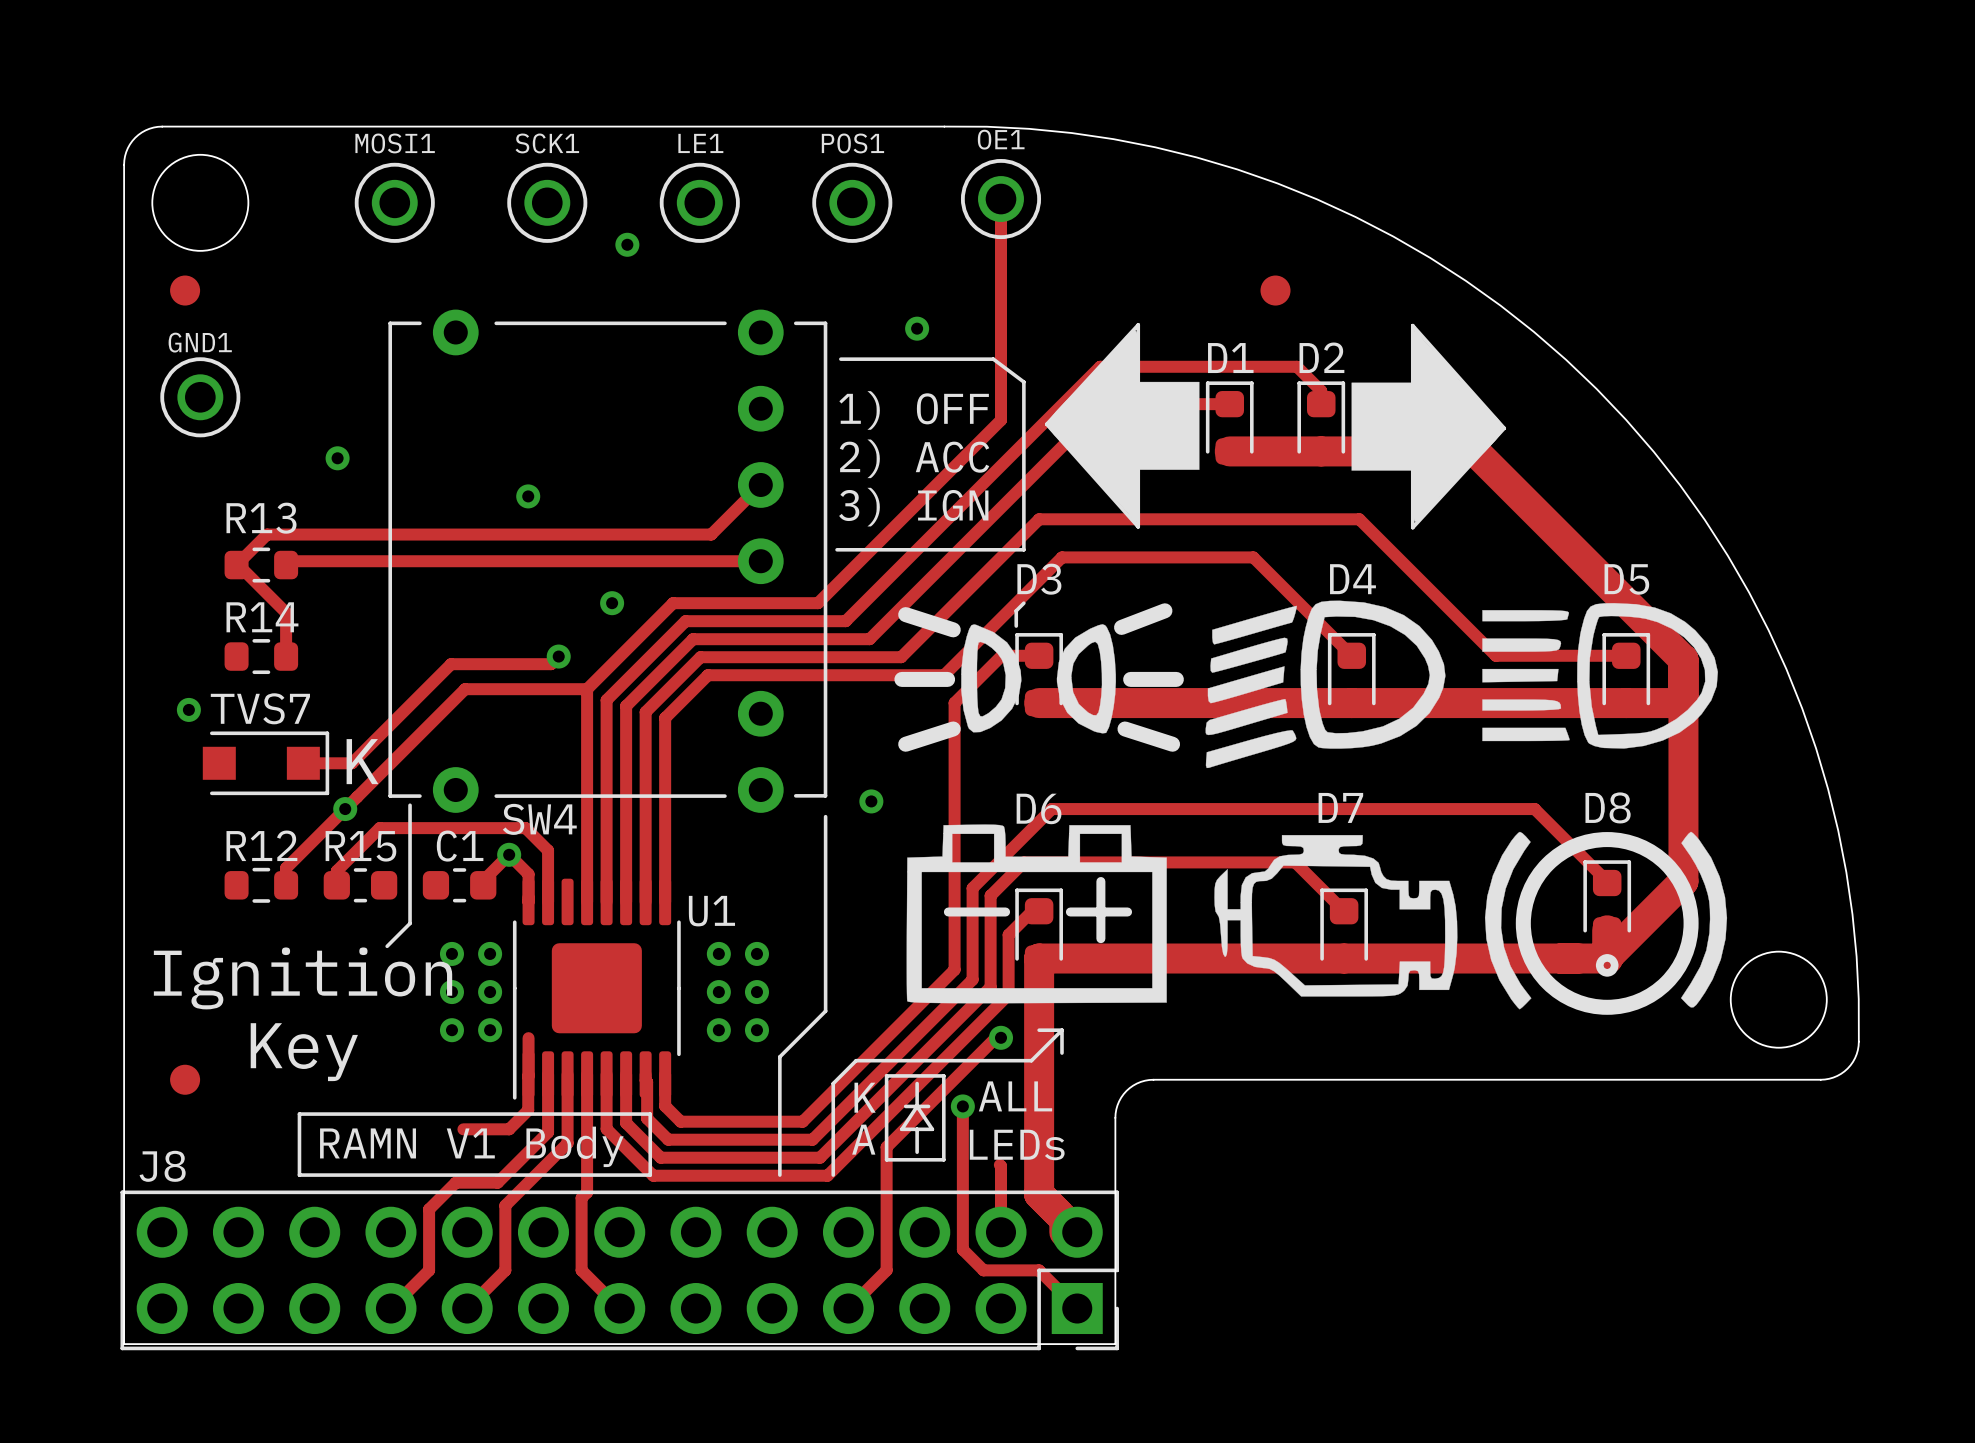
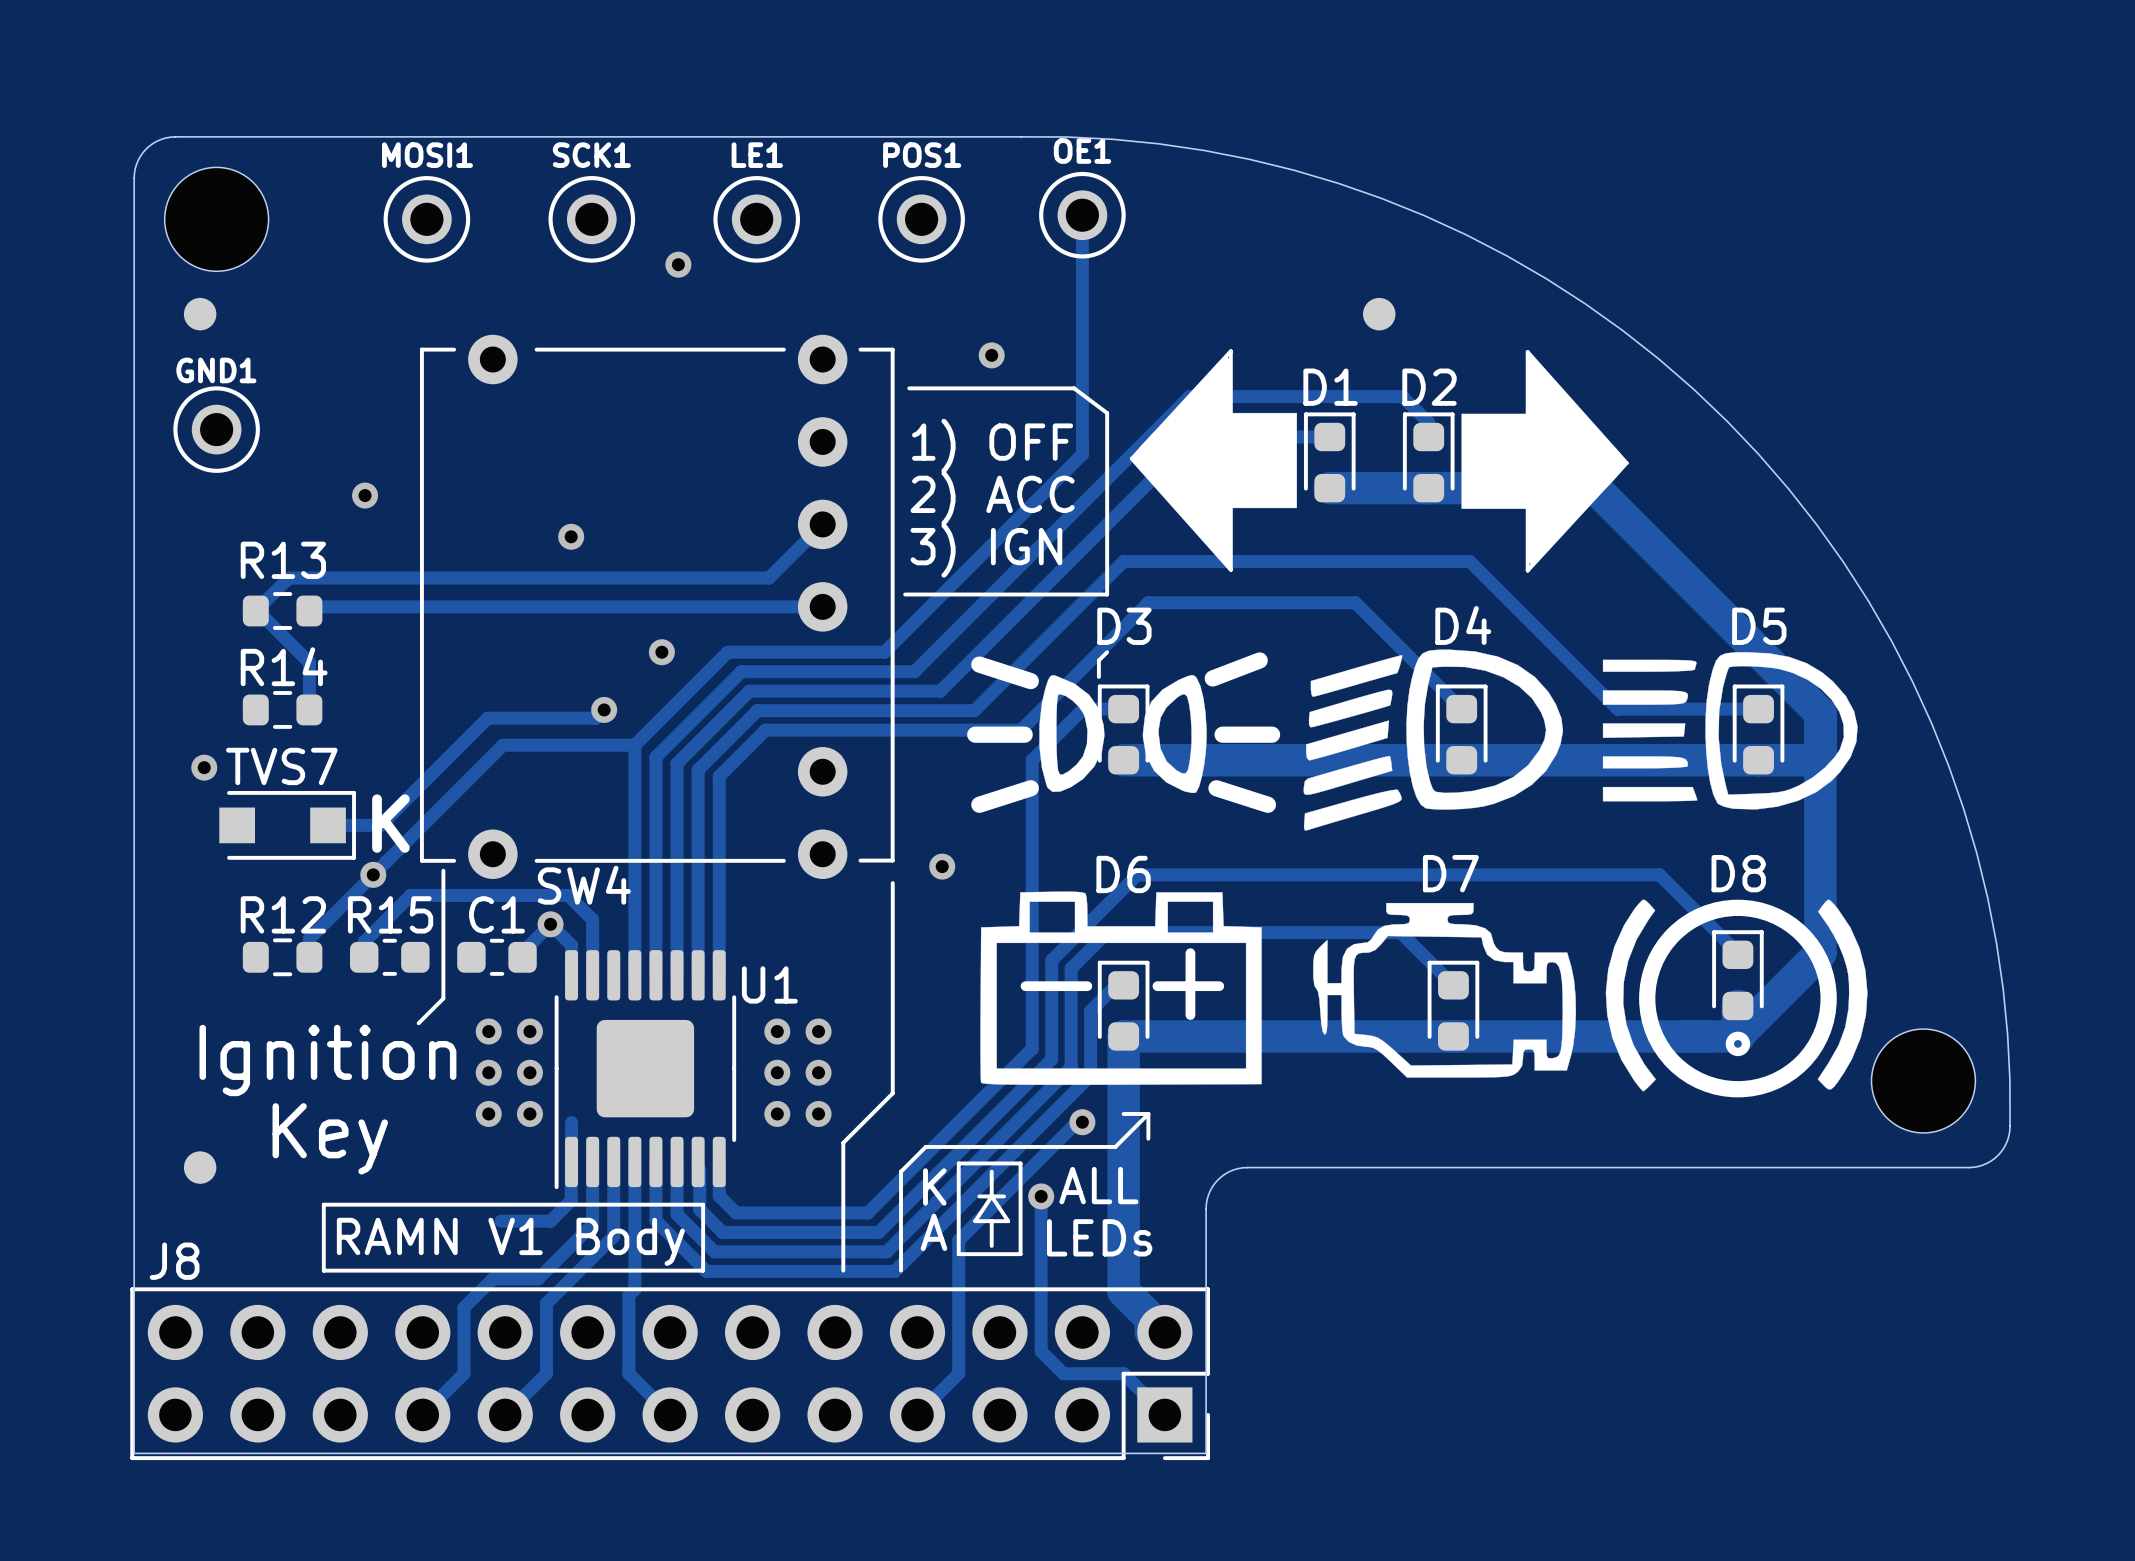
track: (999, 1164) (1000, 1232) -> none

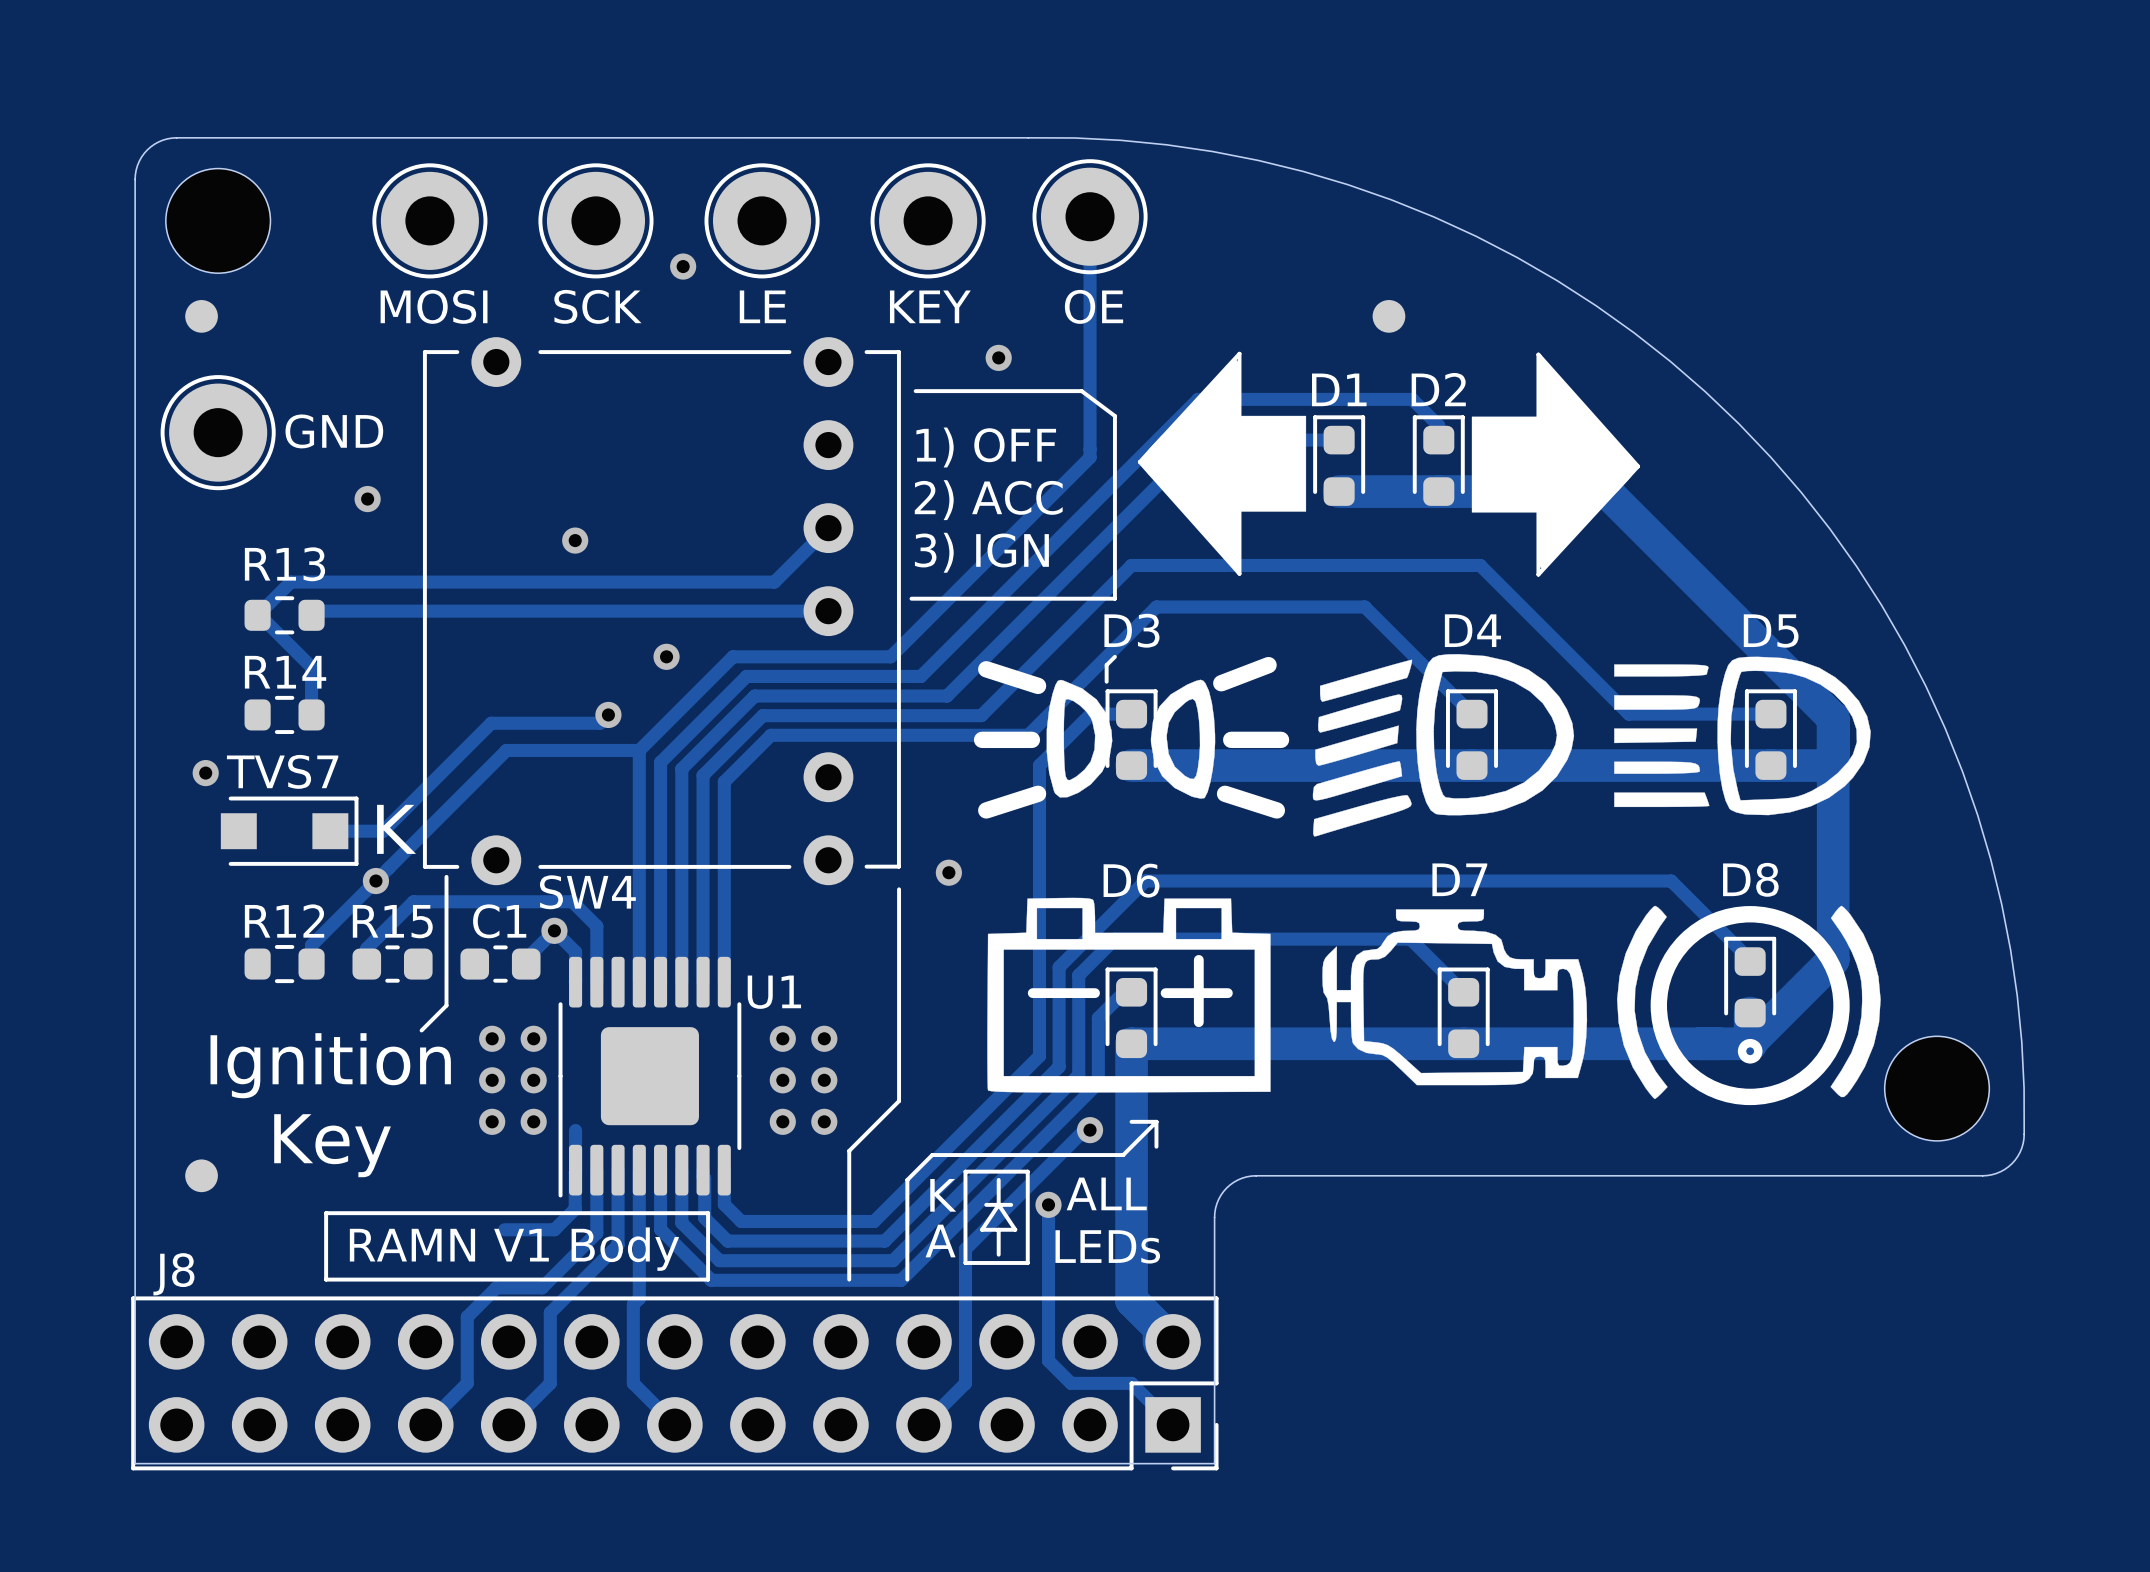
OE1: (1082, 215) -> none
OE: none -> (1090, 216)
MOSI1: (426, 219) -> none
MOSI: none -> (429, 220)
SCK1: (591, 219) -> none
SCK: none -> (595, 220)
LE1: (756, 219) -> none
LE: none -> (762, 220)
POS1: (921, 219) -> none
KEY: none -> (928, 220)
GND1: (216, 429) -> none
GND: none -> (218, 432)

